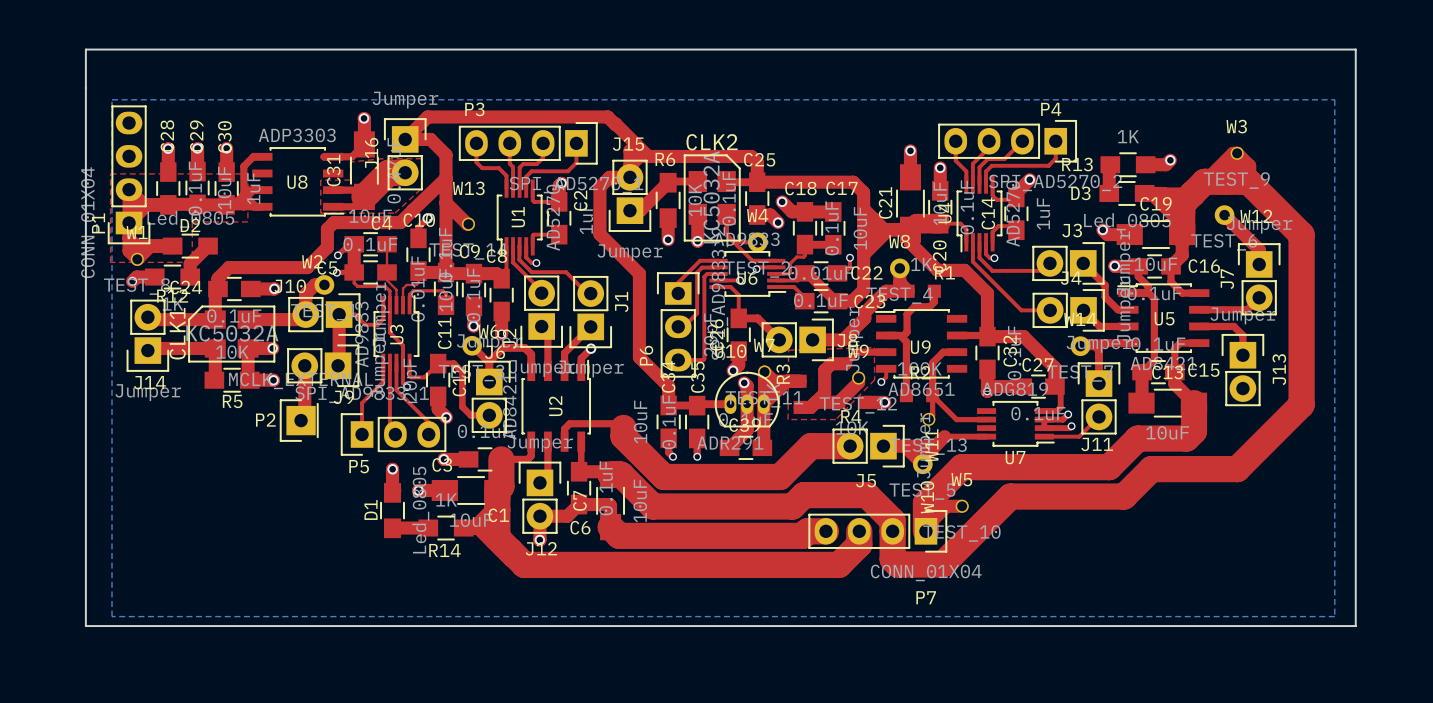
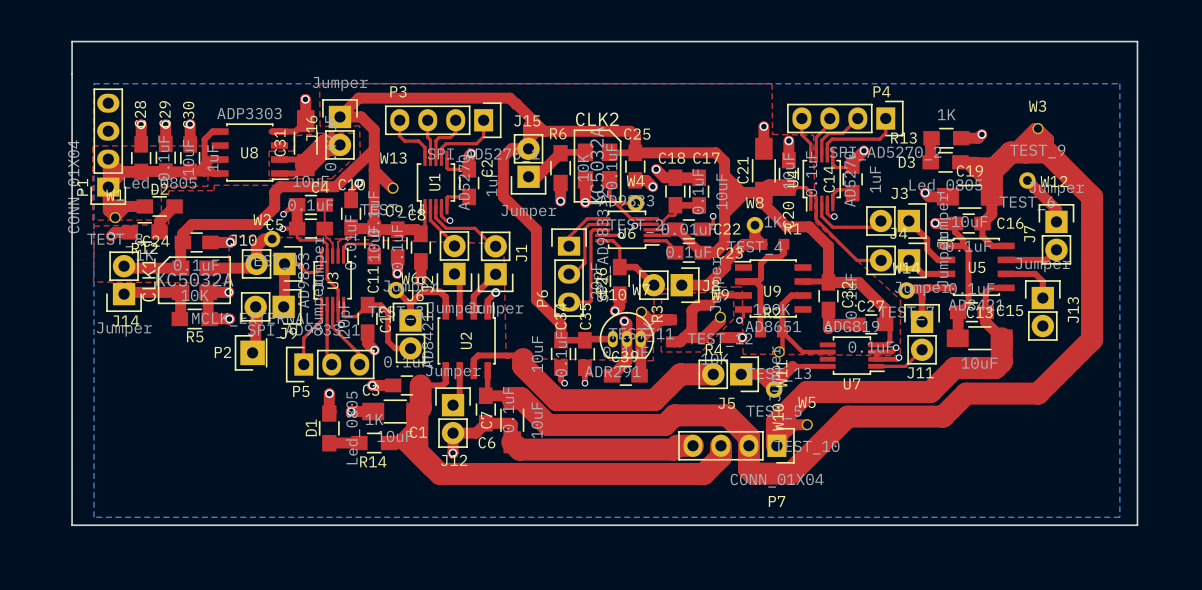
top zone outline: none -> (319, 83) (320, 126) (359, 125) (360, 161) (336, 185) (214, 185) (214, 190) (168, 190) (168, 224) (93, 226) (93, 281) (228, 283) (229, 235) (503, 243) (506, 358) (653, 360) (654, 289) (736, 286) (742, 286) (743, 354) (900, 355) (900, 299) (814, 221) (813, 135) (772, 134) (772, 83) (319, 83)

